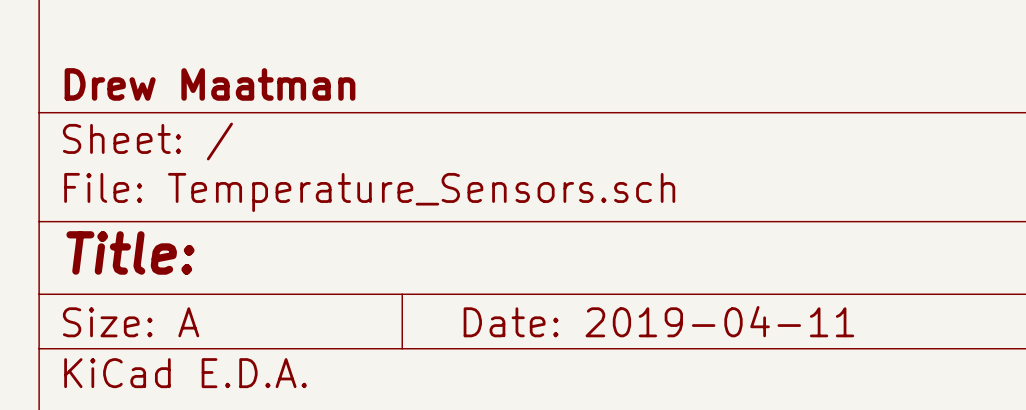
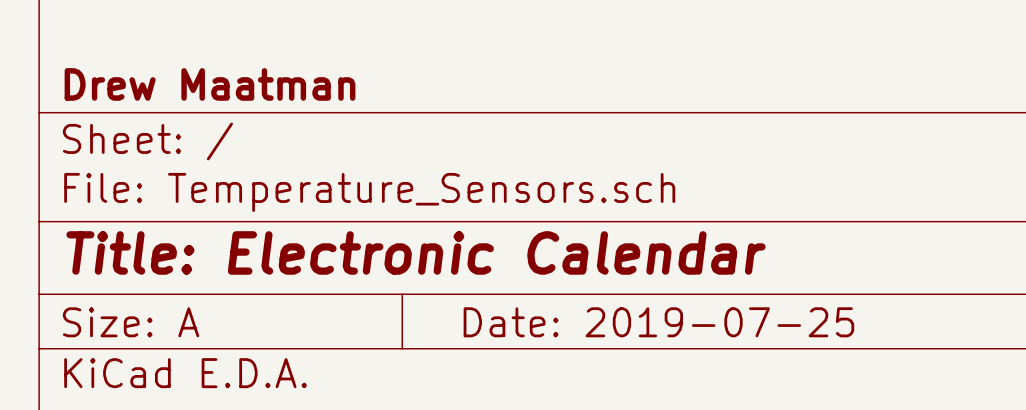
title block: Title: (130, 252) -> Title: Electronic Calendar (416, 252)
title block: Date: 2019-04-11 (658, 321) -> Date: 2019-07-25 (658, 322)

